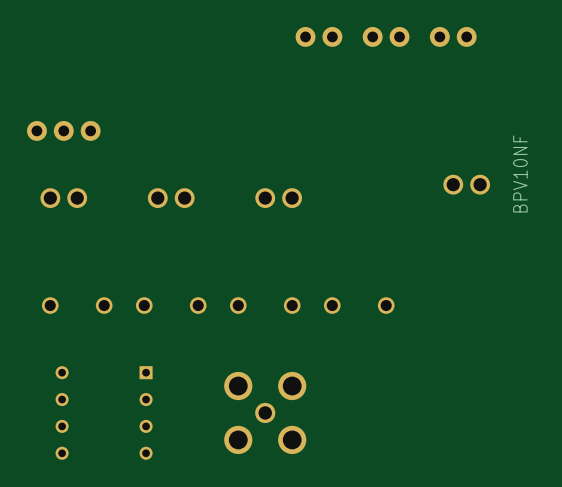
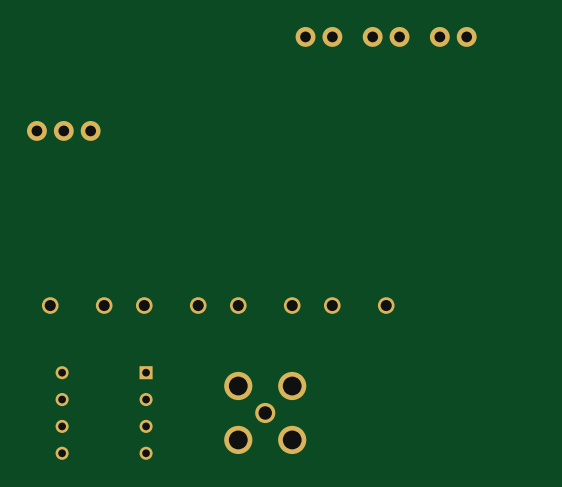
part: BPV10NF (466, 184) -> none
part: (63, 198) -> none
part: (171, 198) -> none
part: (278, 198) -> none

